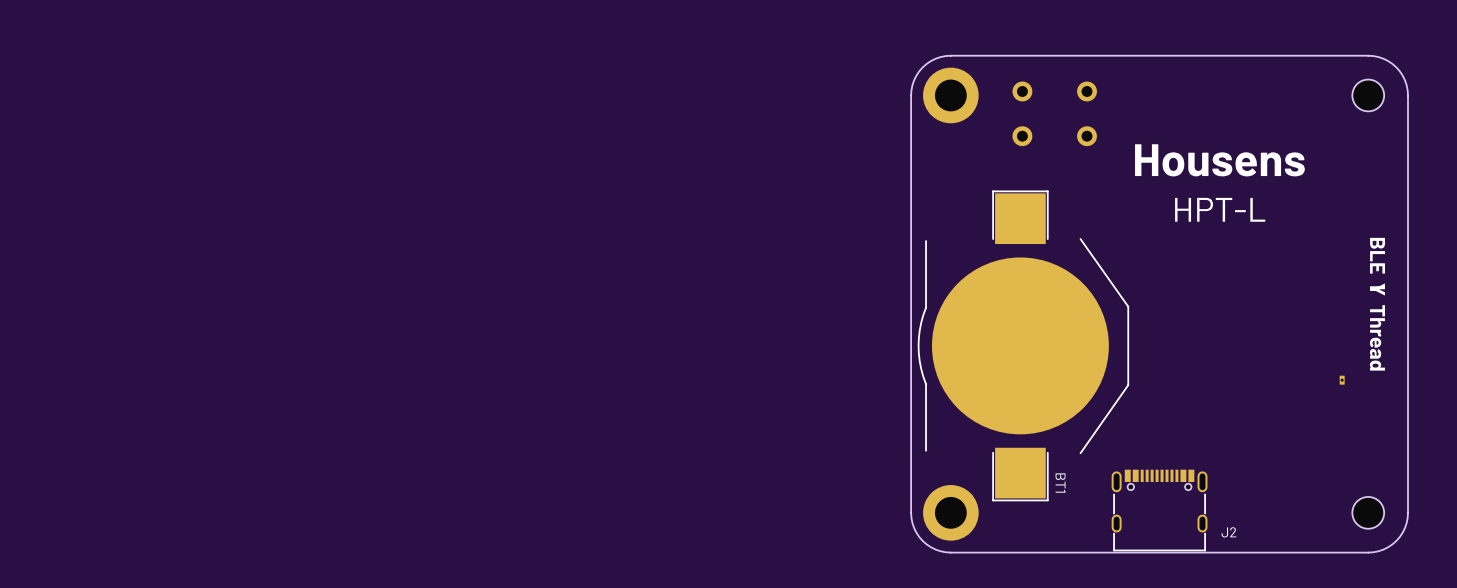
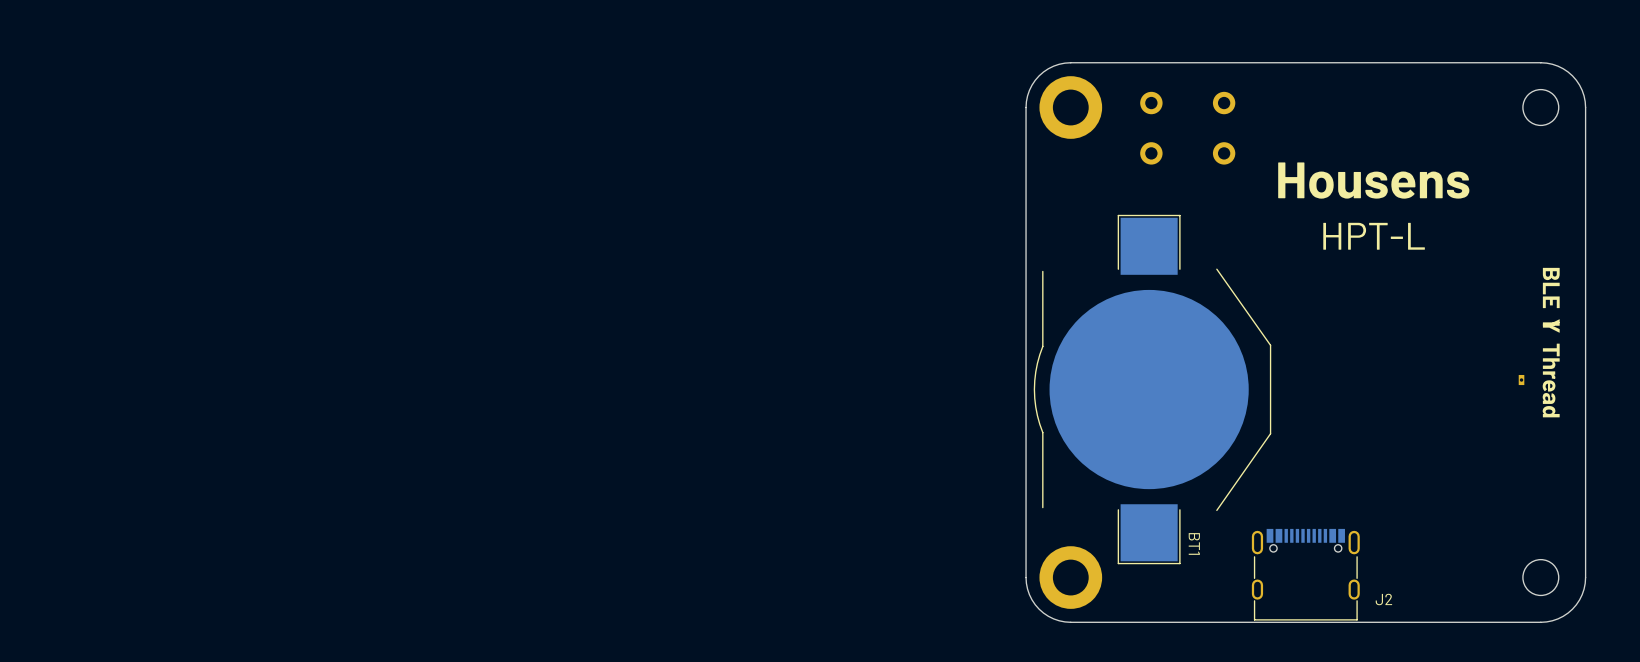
part position: (1342, 380) -> (1521, 380)

